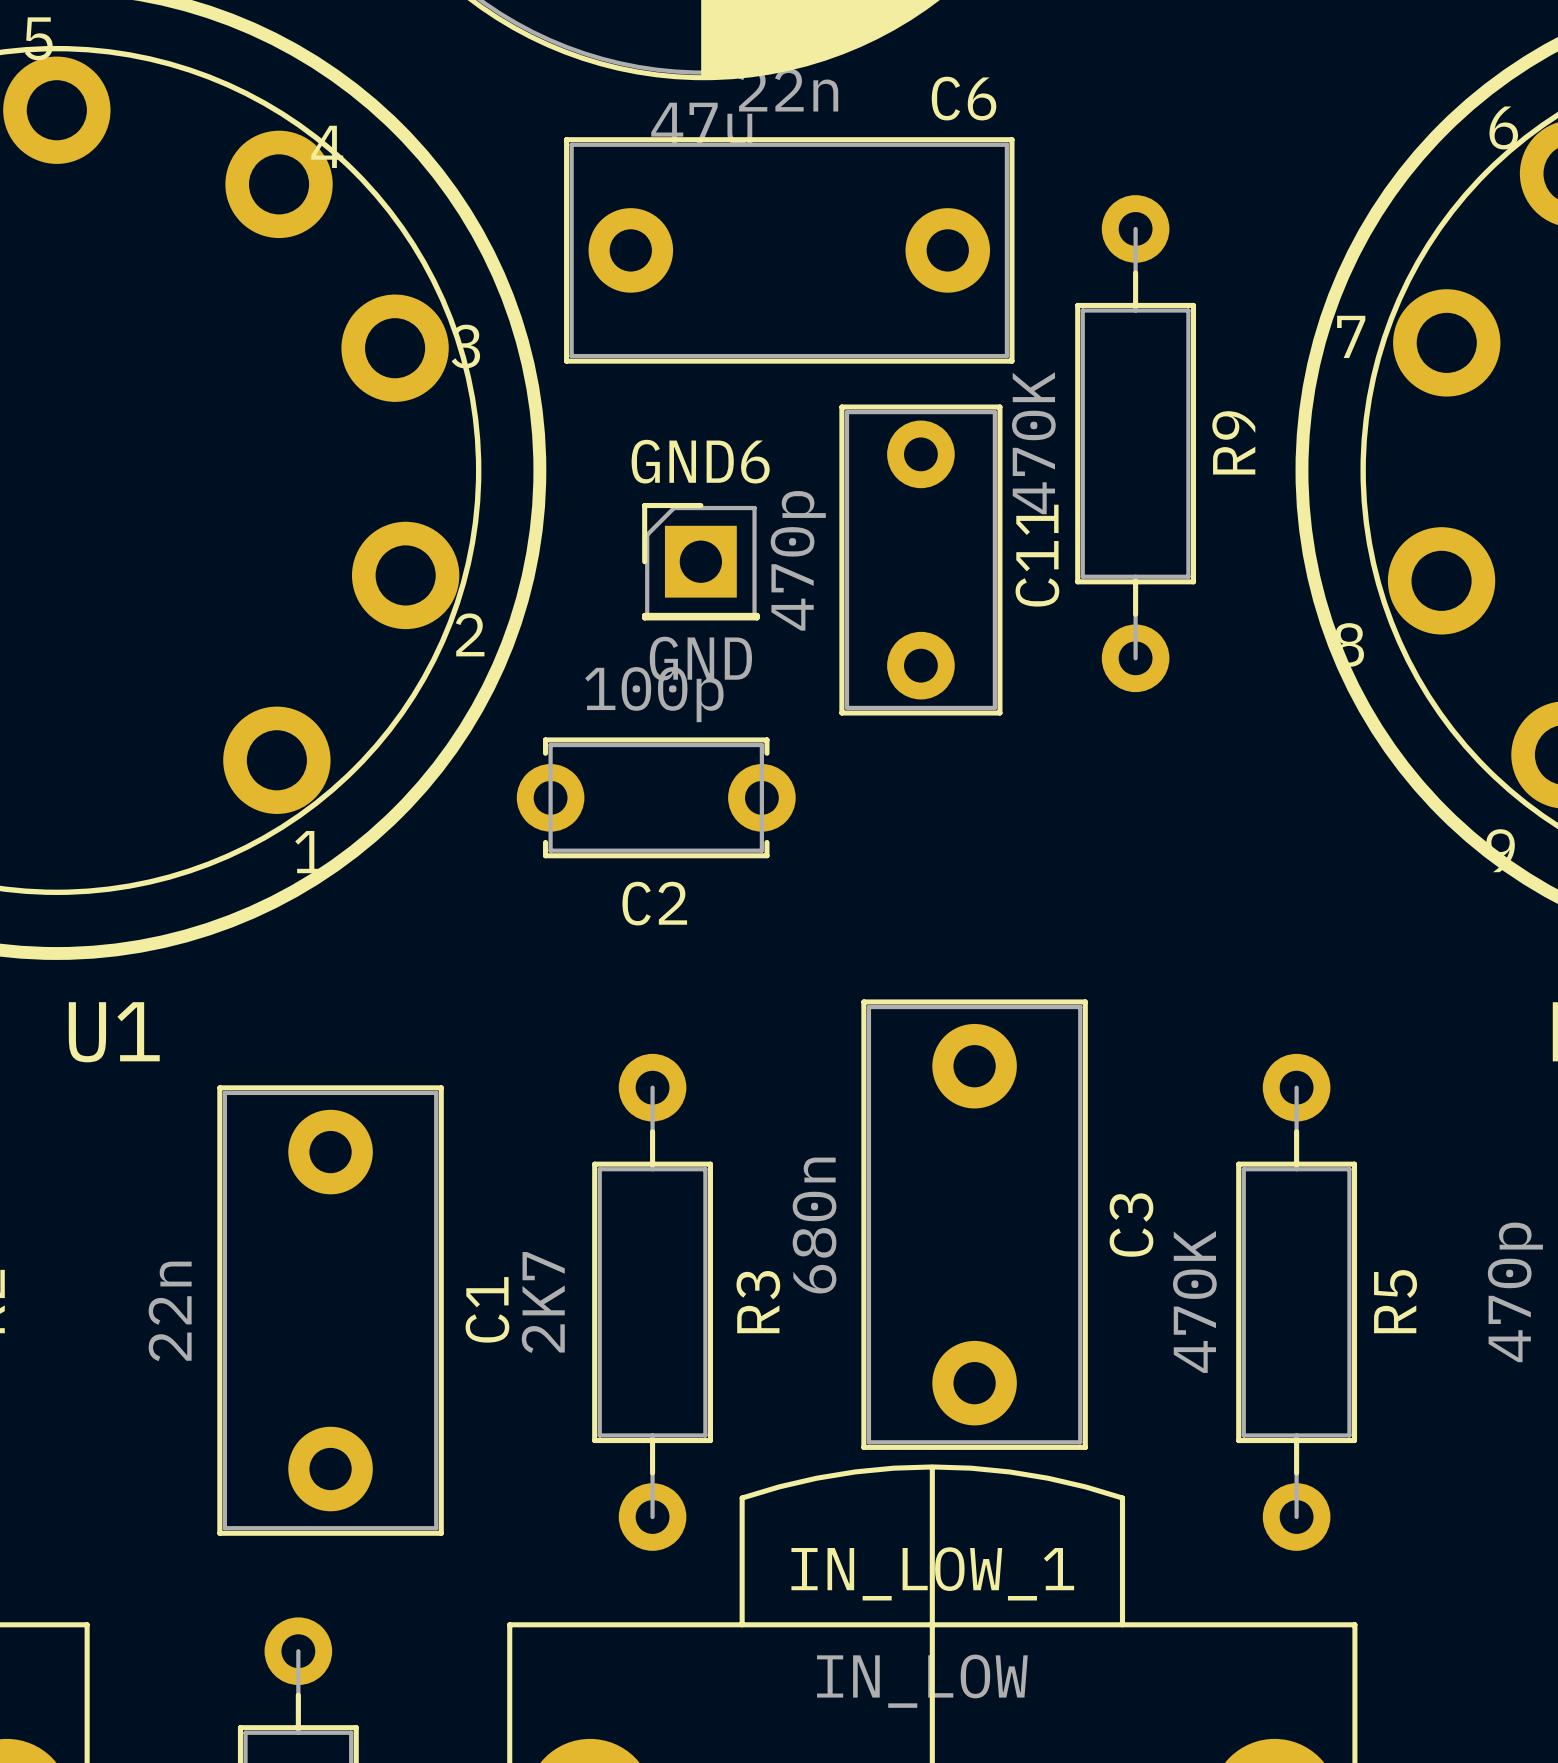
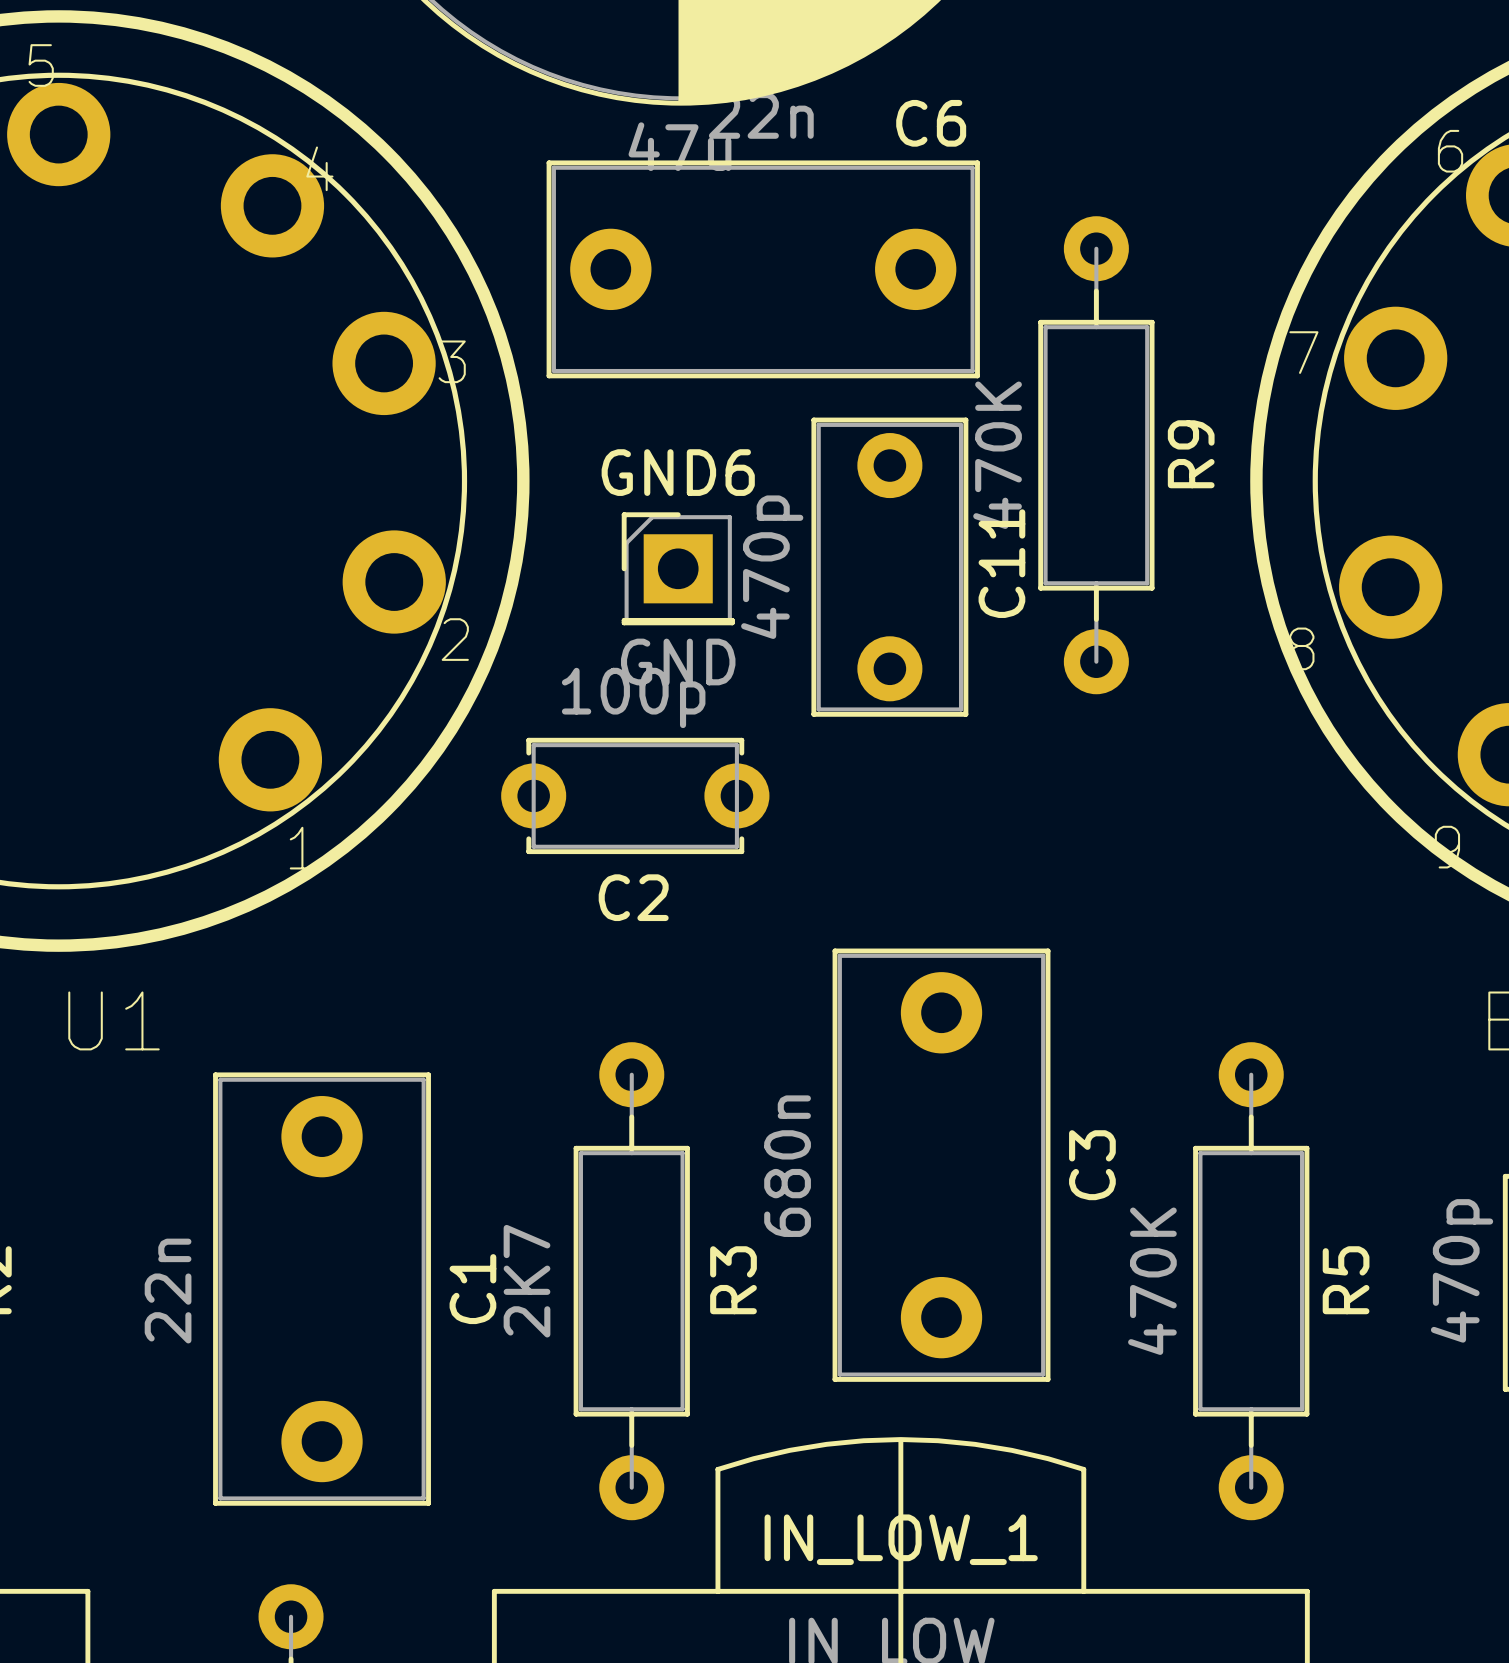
C3 position: (974, 1224) -> (941, 1165)

